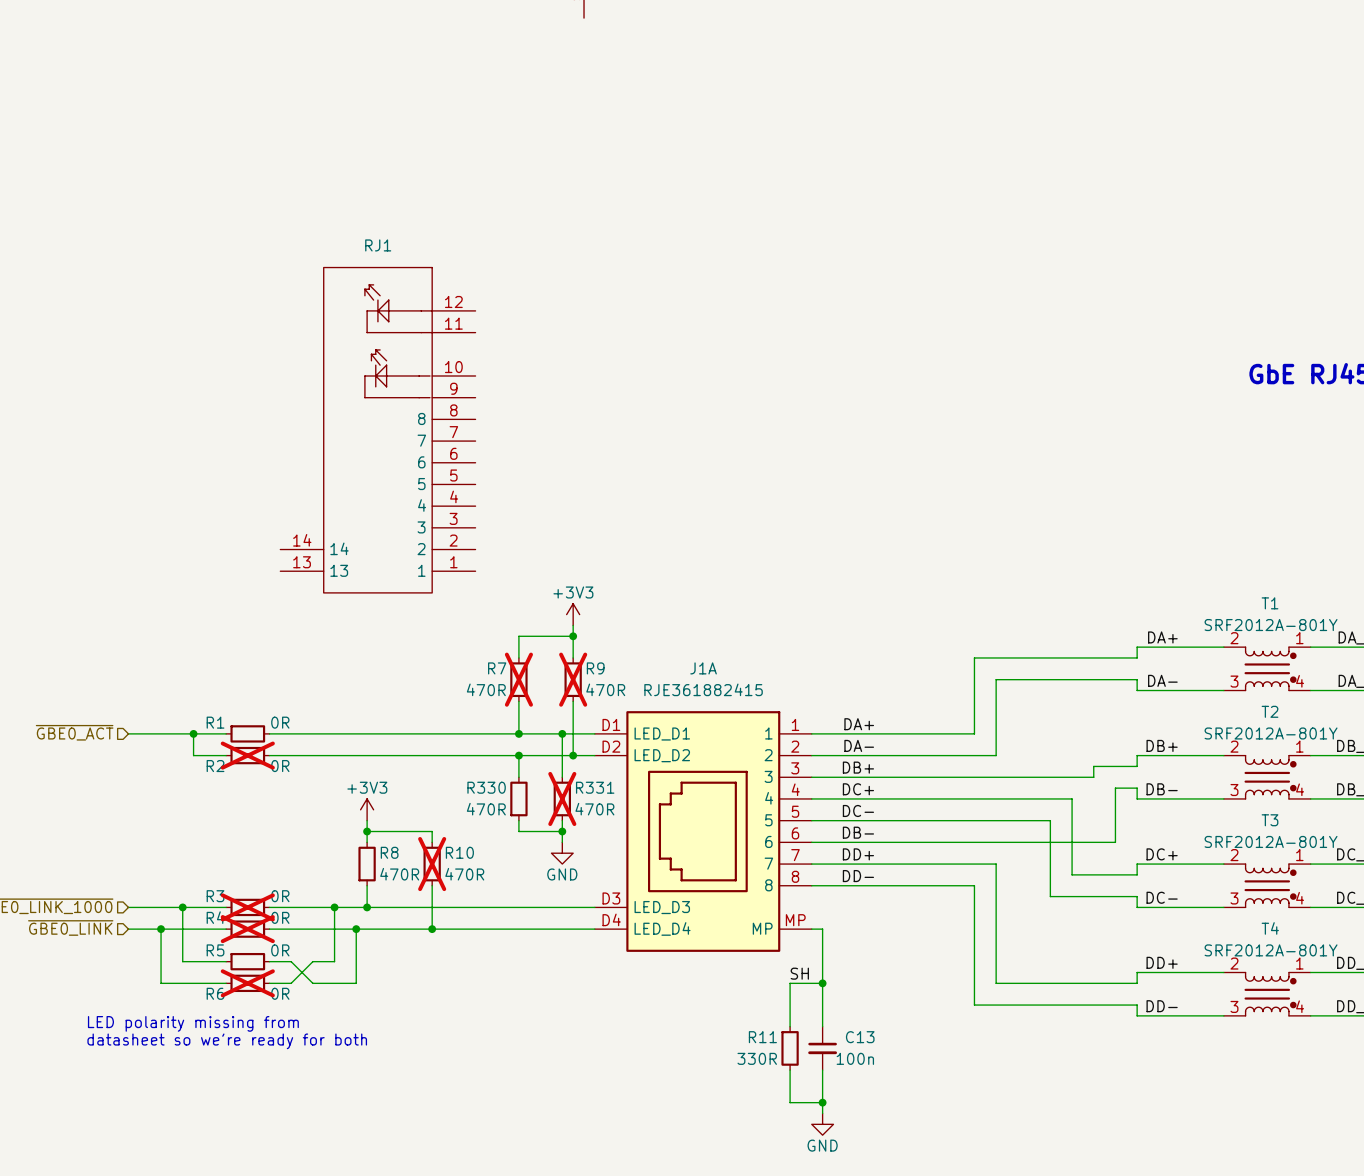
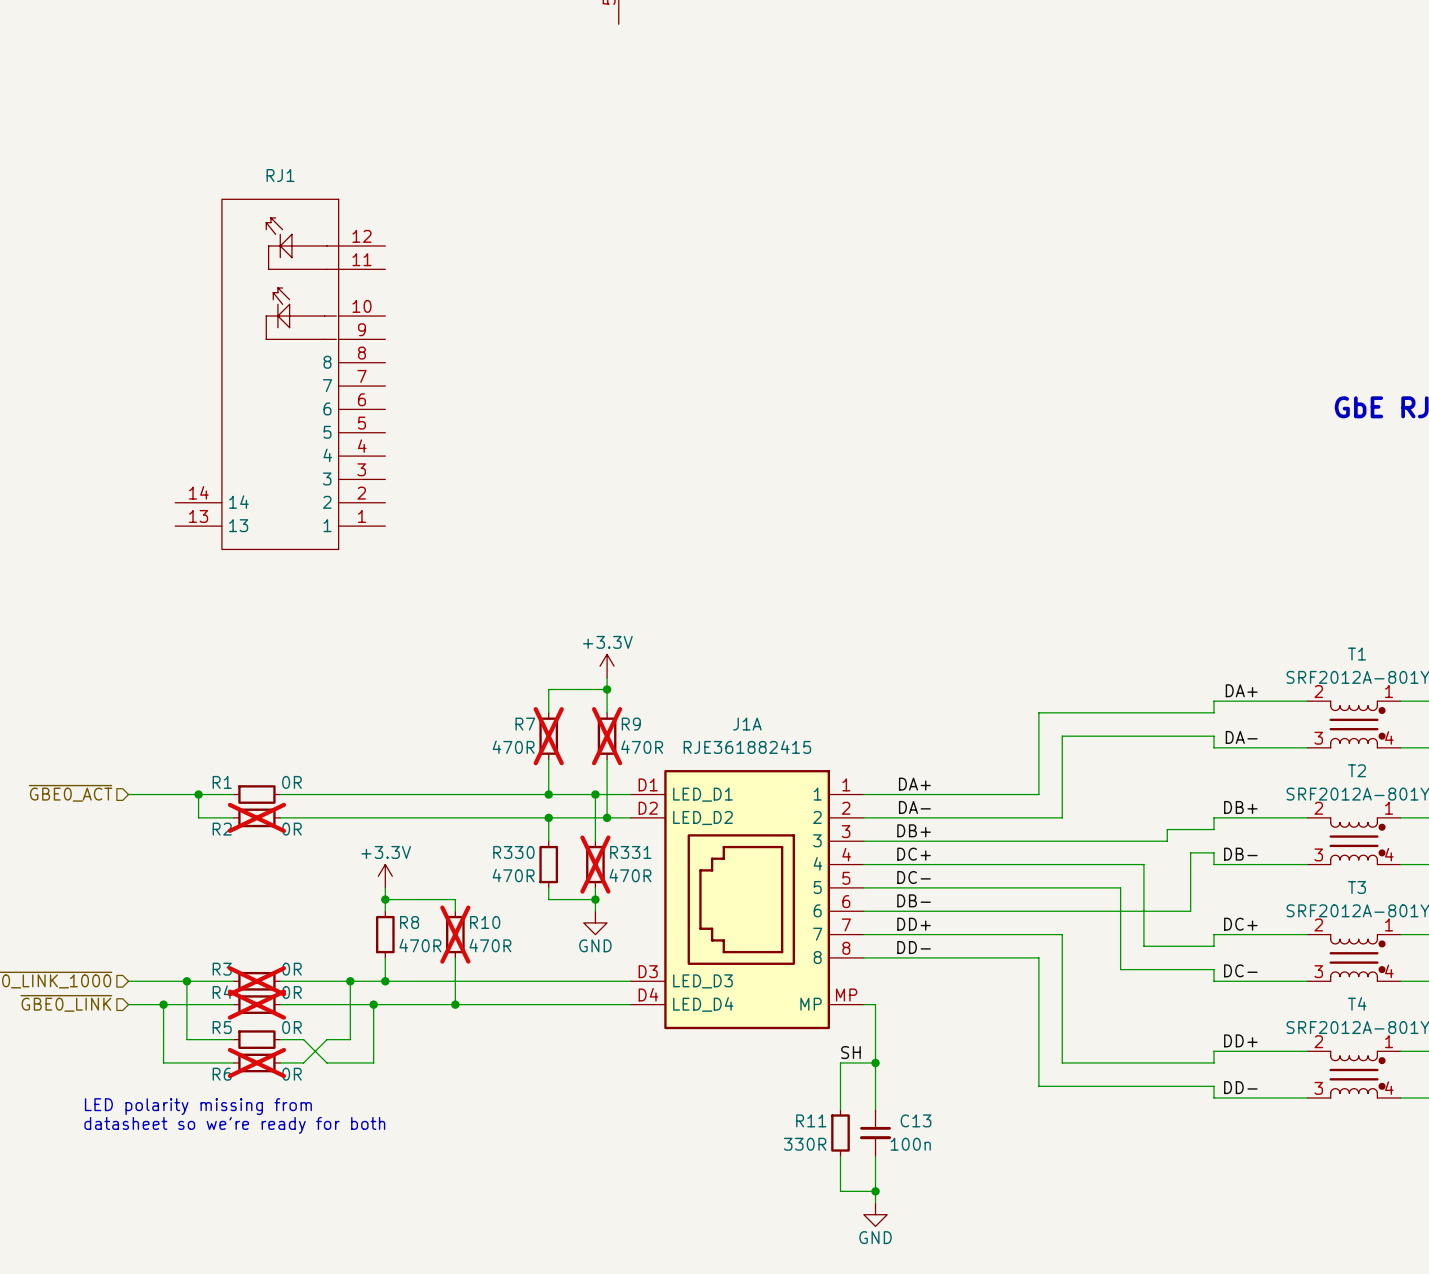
RJ1 position: (377, 430) -> (280, 374)
power symbol: +3V3 (573, 614) -> +3.3V (607, 666)
power symbol: +3V3 (367, 809) -> +3.3V (385, 876)

